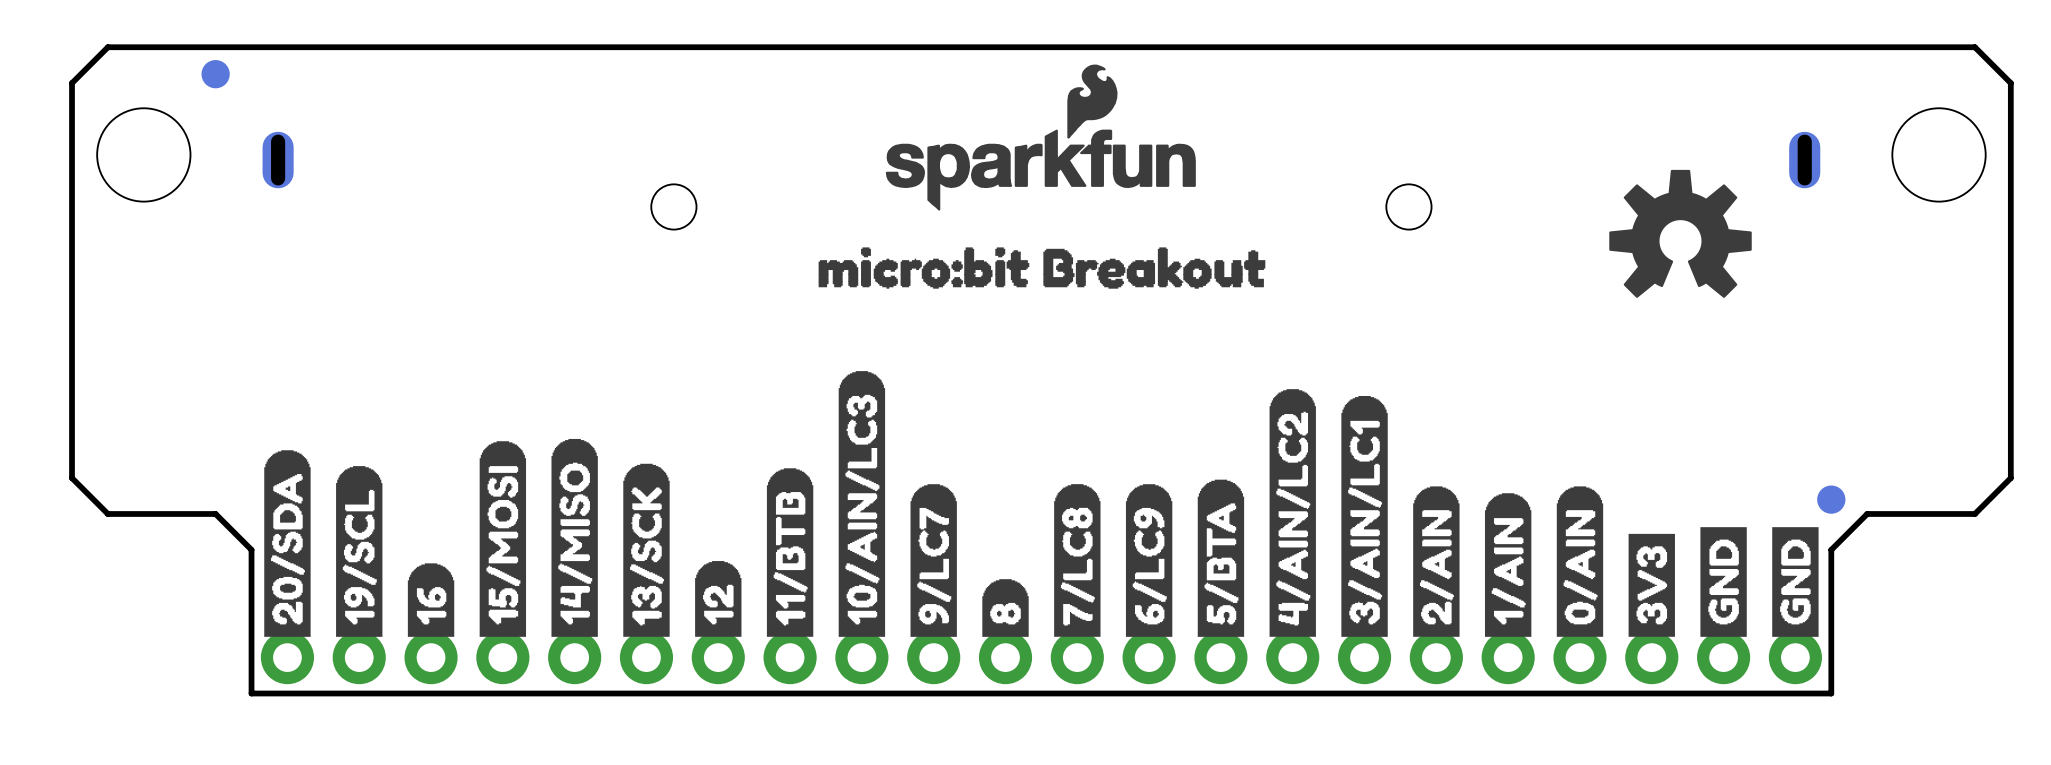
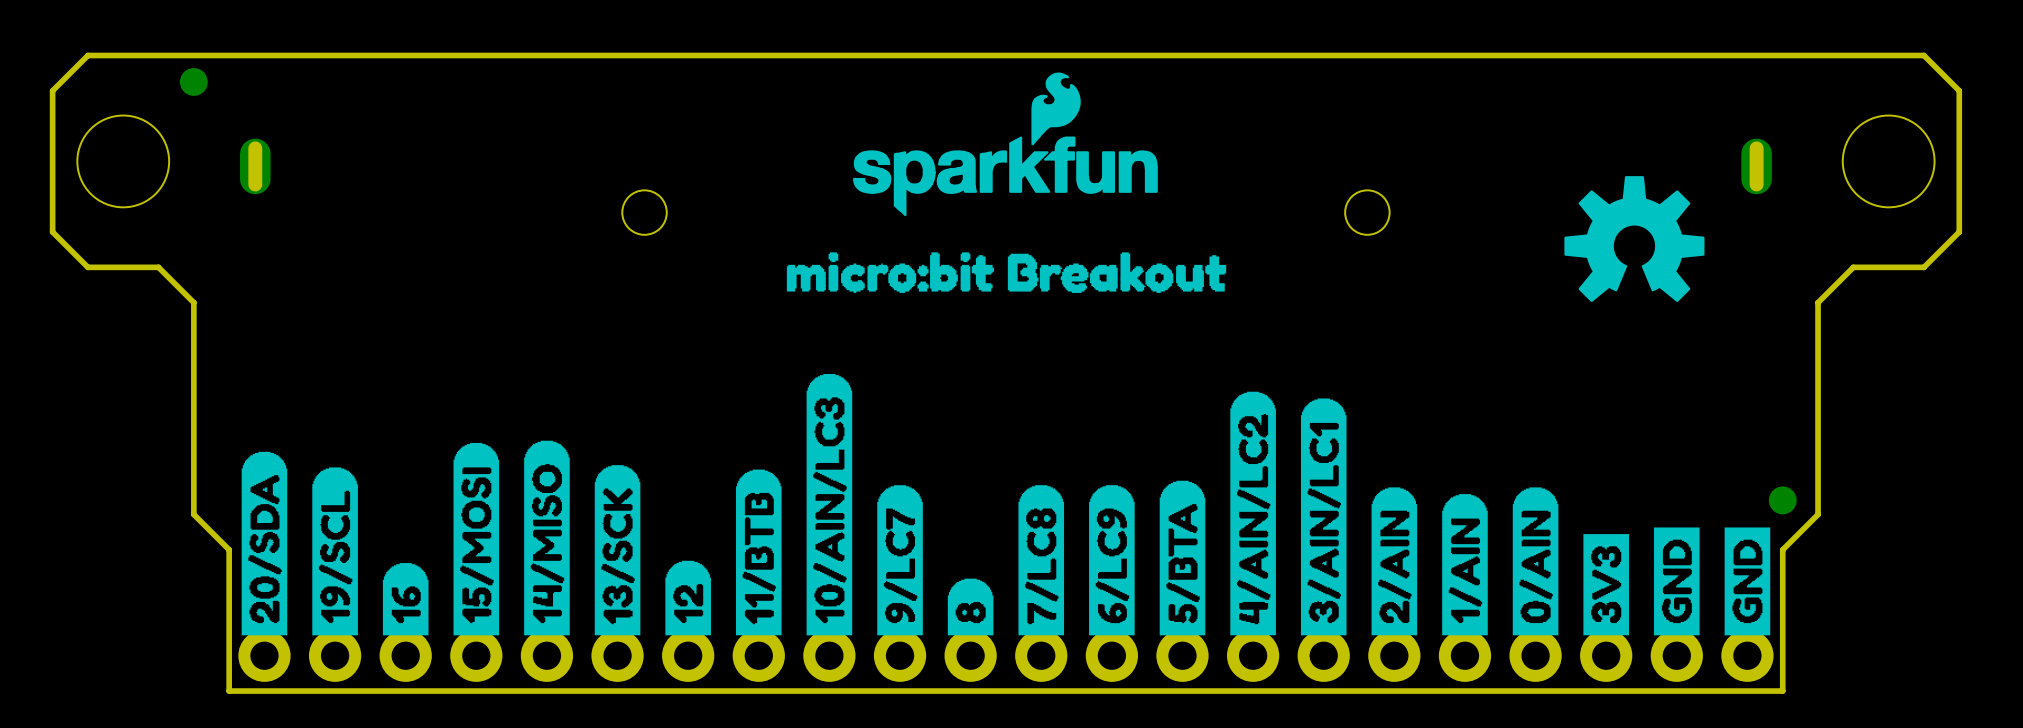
board edge: (72, 226) (72, 478) (107, 513) (215, 513) -> (52, 232) (87, 267) (158, 267) (193, 302) (193, 514)
board edge: (2010, 226) (2010, 478) (1974, 513) (1867, 513) -> (1959, 232) (1923, 267) (1853, 267) (1818, 302) (1818, 514)

